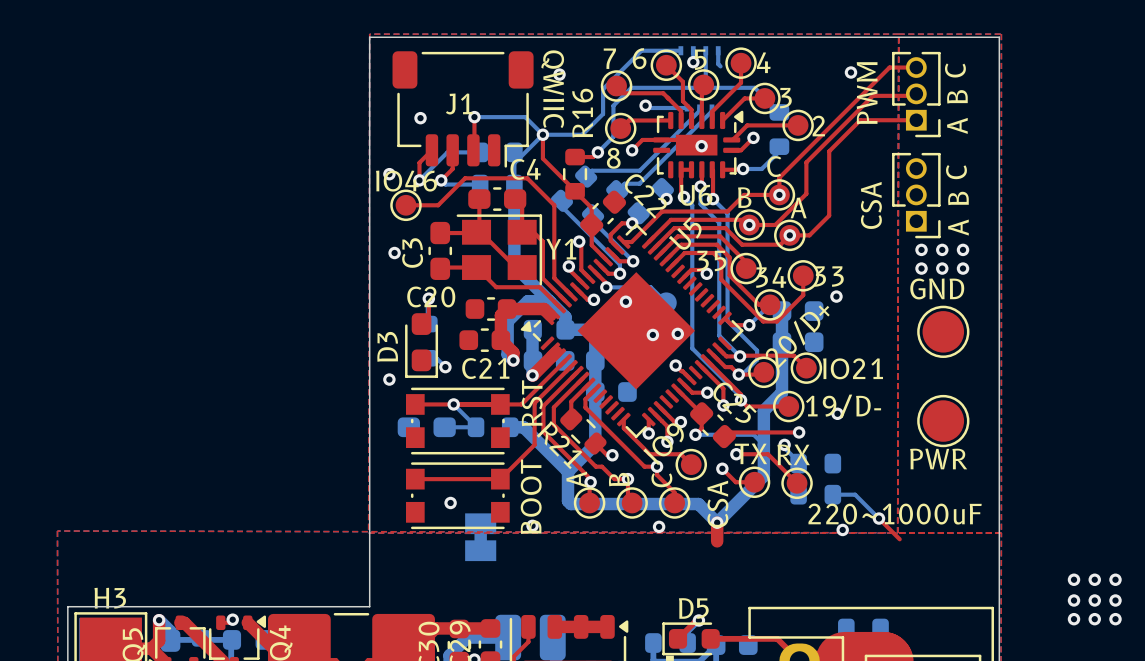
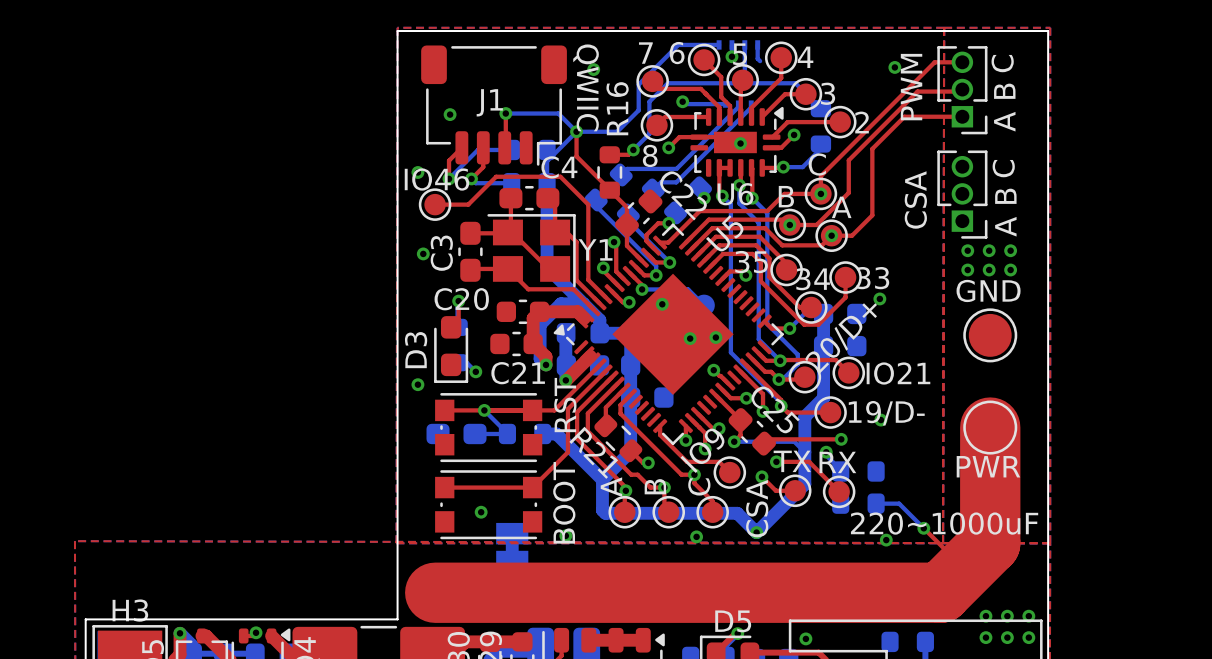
top track: none -> (990, 427) (990, 543) (940, 592) (435, 592)
top track: (717, 522) (717, 541) -> none
via: (1074, 579) -> none
via: (1094, 579) -> none
via: (1115, 579) -> none
via: (1074, 600) -> none
via: (1094, 600) -> none
via: (1115, 600) -> none
via: none -> (985, 616)
via: none -> (1007, 616)
via: none -> (1028, 616)
via: (1074, 619) -> none
via: (1094, 619) -> none
via: (1115, 619) -> none
via: none -> (985, 637)
via: none -> (1007, 637)
via: none -> (1028, 637)
via: none -> (805, 638)

